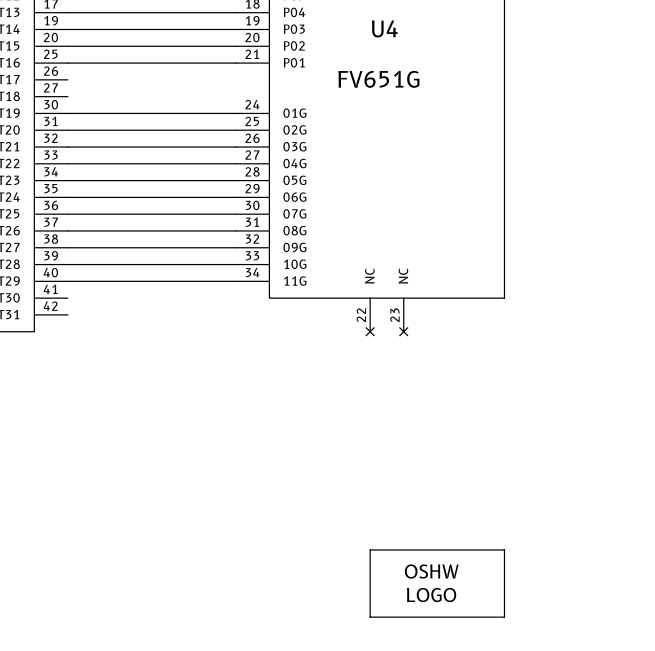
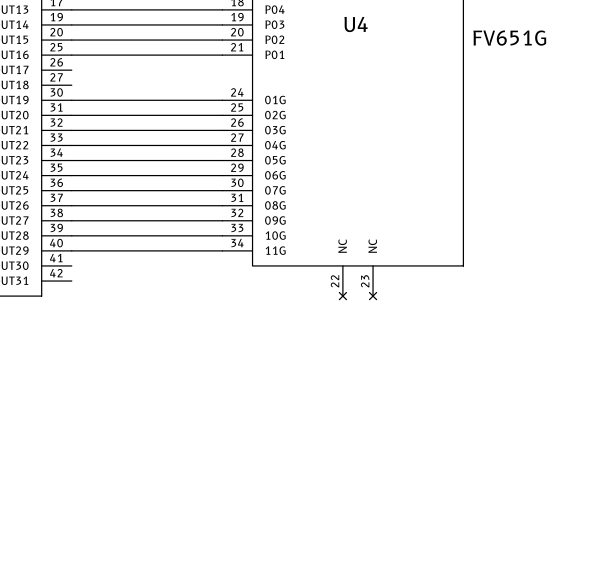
U4 value position: FV651G (378, 79) -> FV651G (509, 38)
part: (437, 583) -> none

